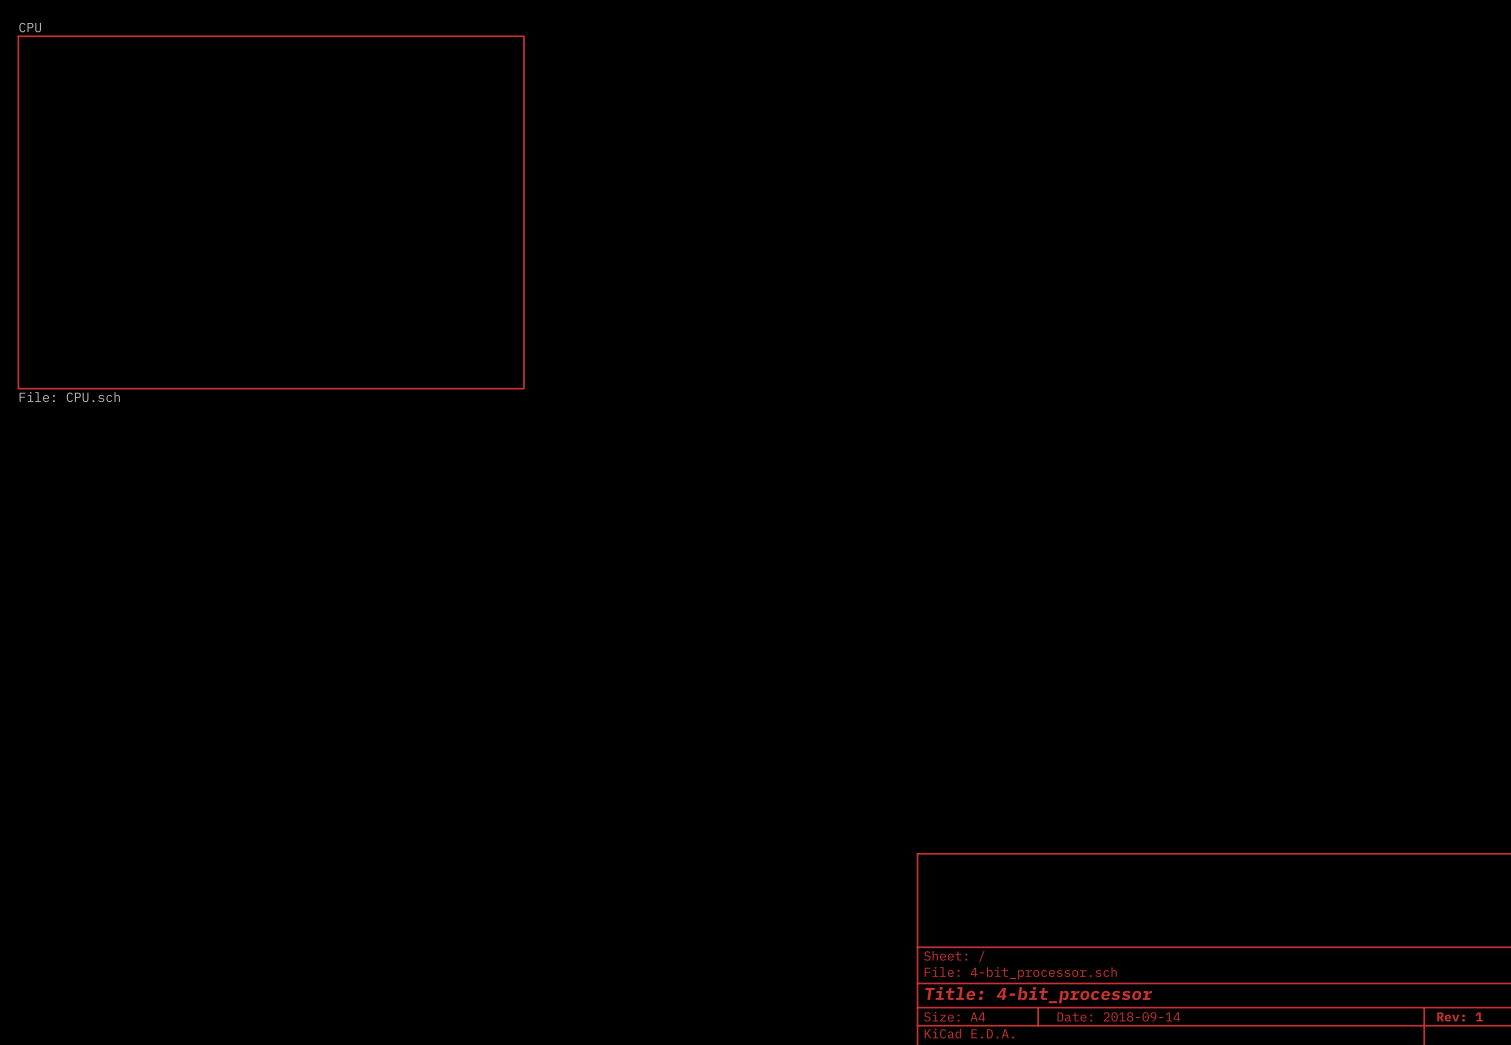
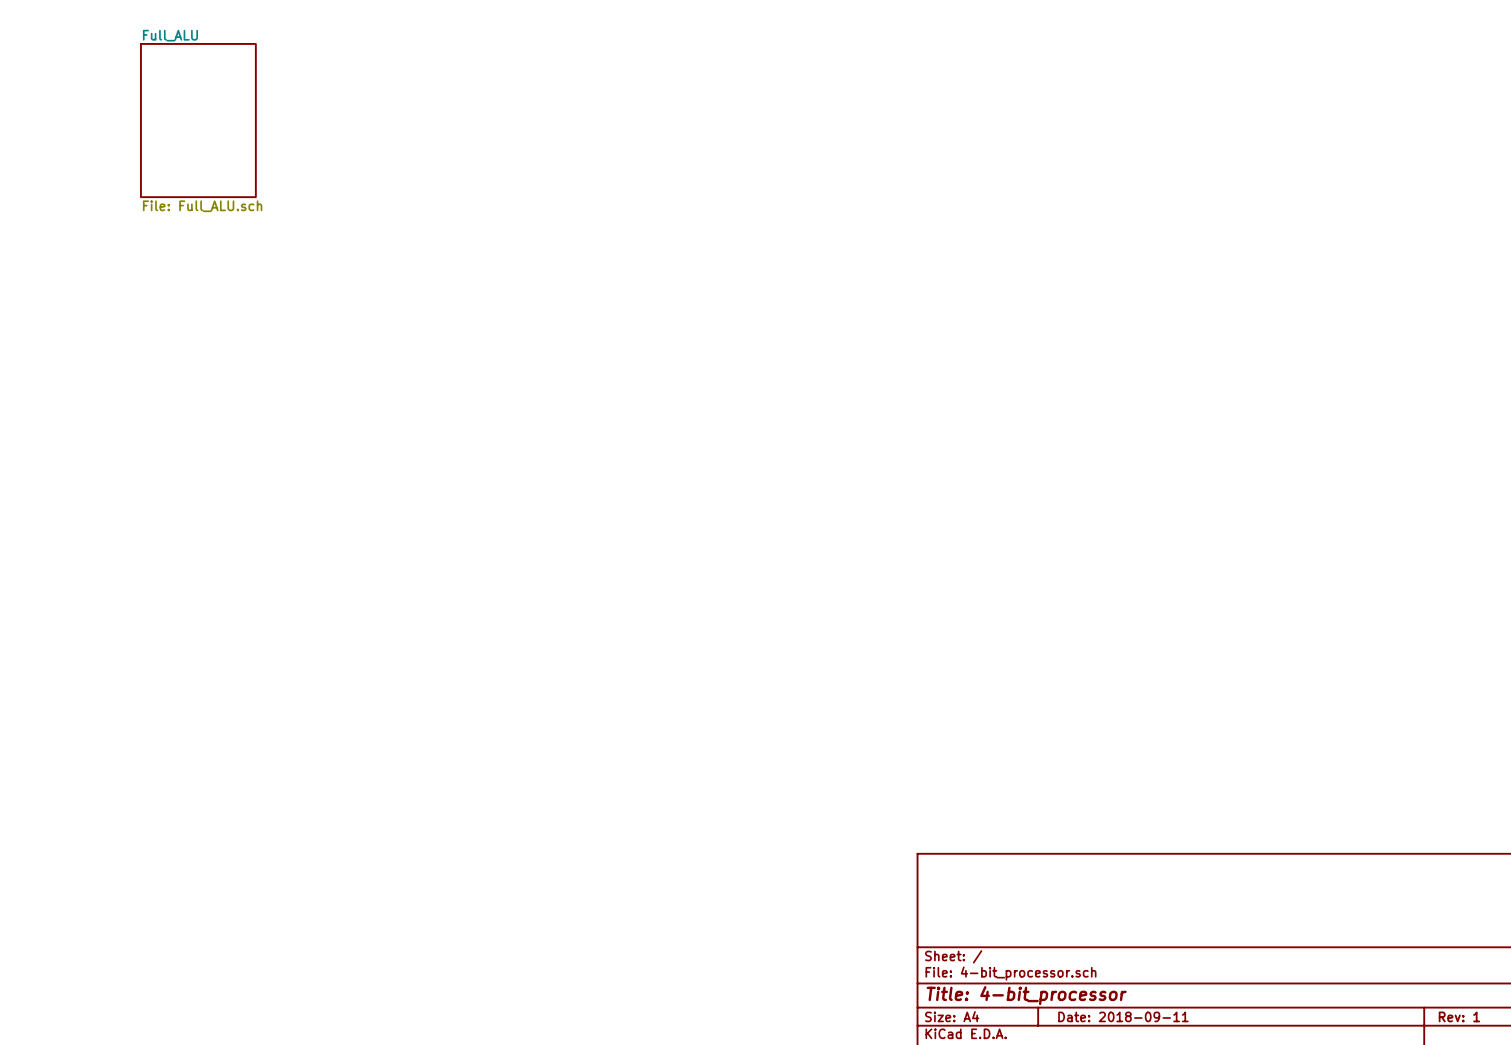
sheet Full_ALU: none -> File: Full_ALU.sch (198, 120)
sheet CPU: File: CPU.sch (271, 212) -> none
title block: Date: 2018-09-14 (1118, 1016) -> Date: 2018-09-11 (1123, 1016)

